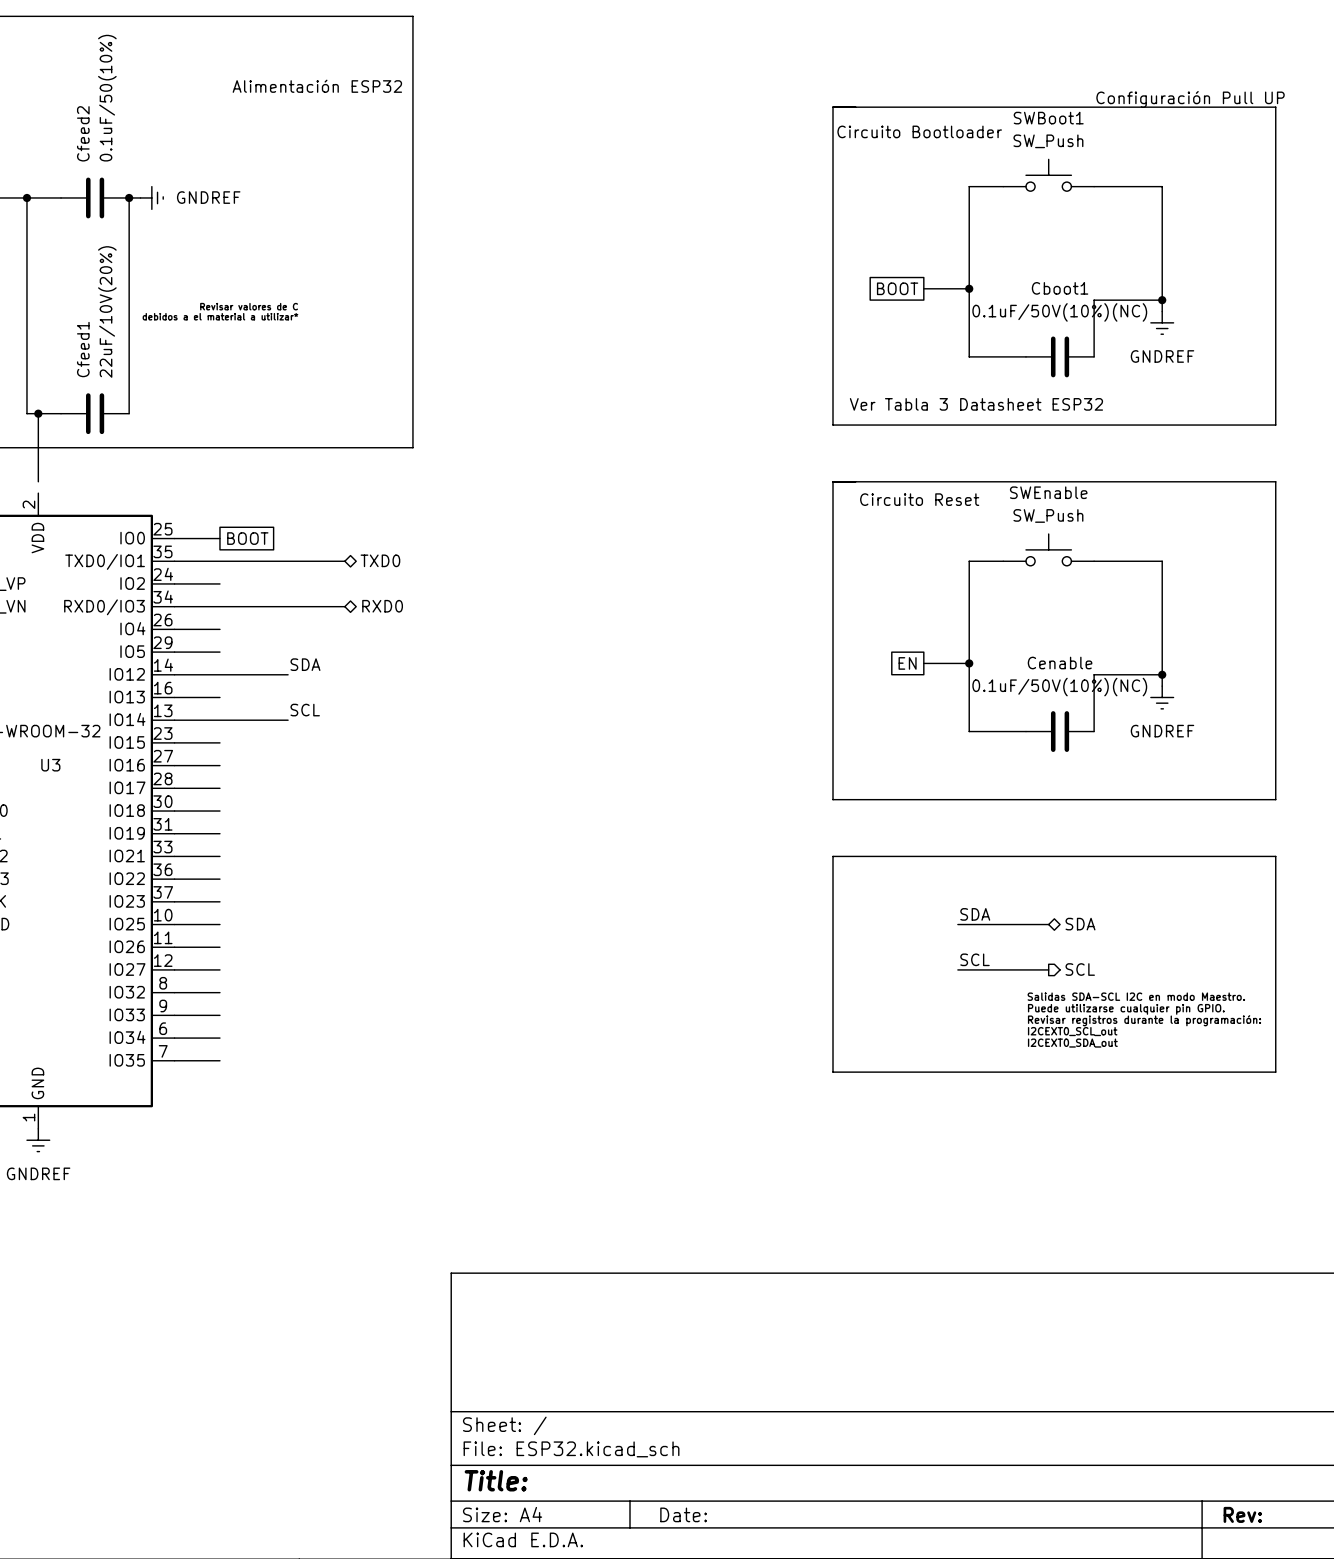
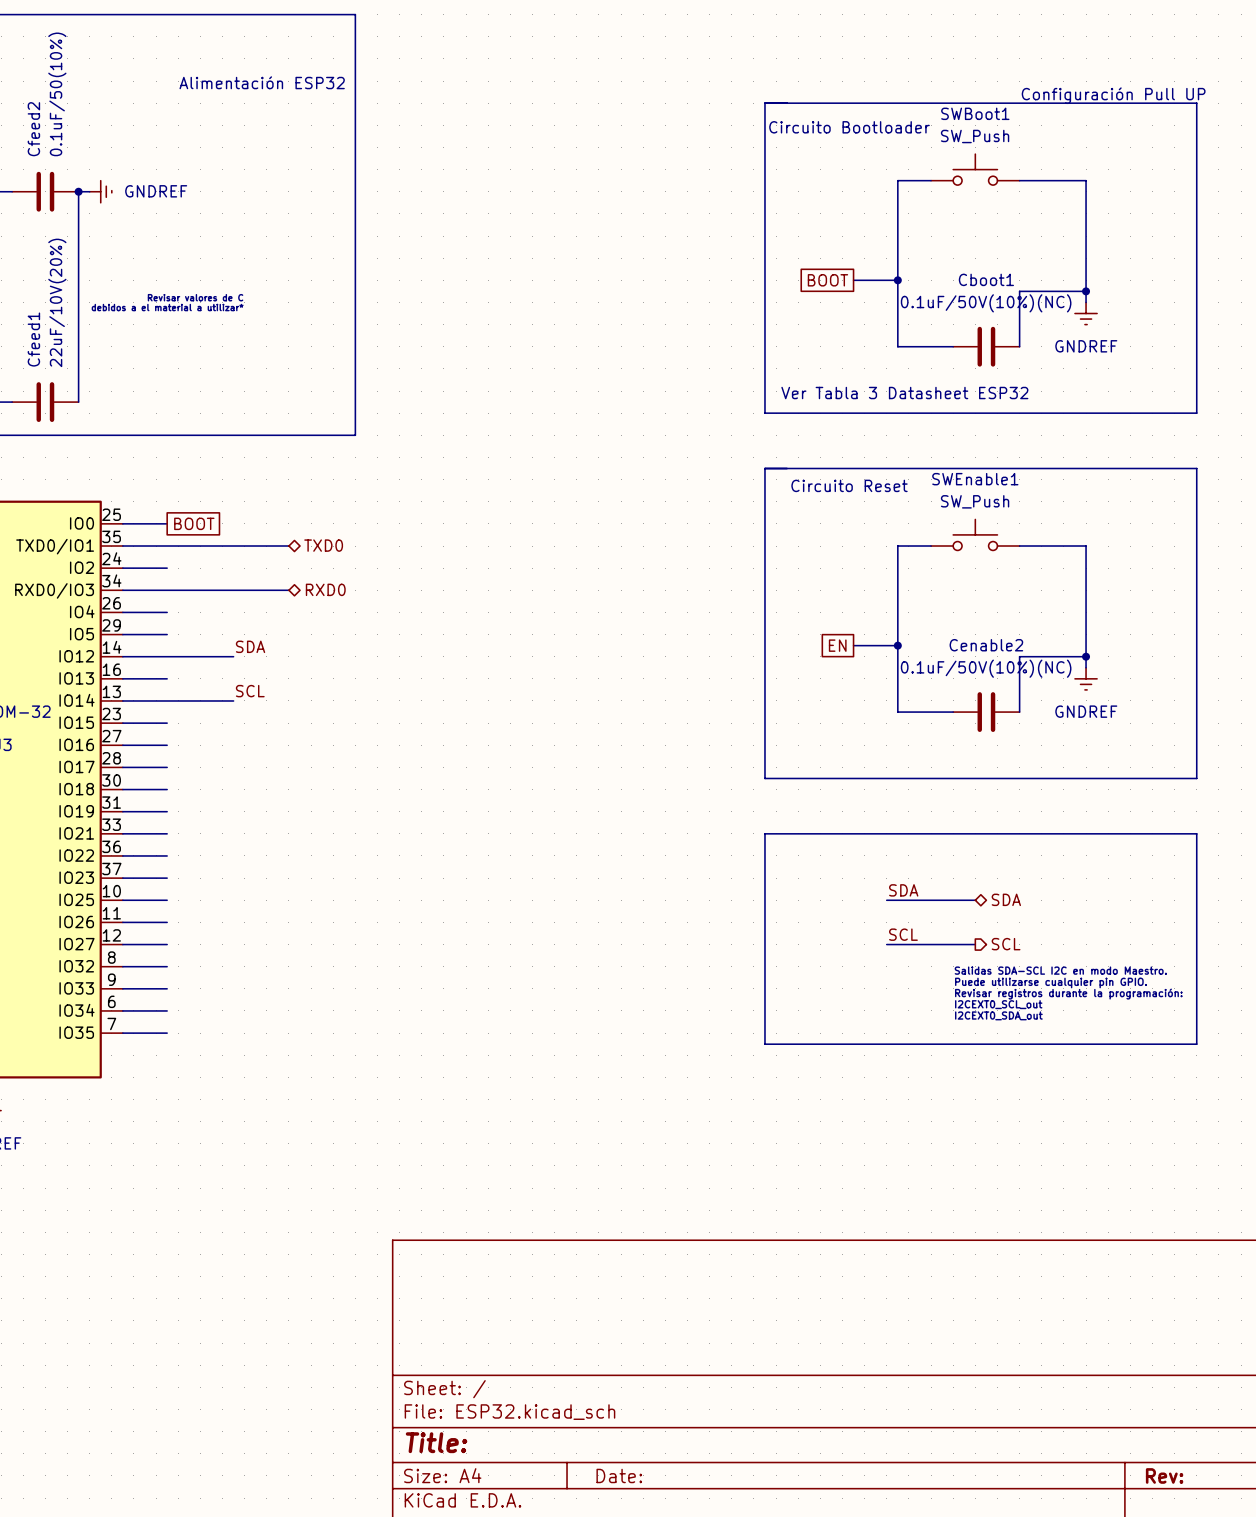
SWEnable name: SWEnable (1048, 492) -> SWEnable1 (975, 479)
Cenable name: Cenable (1060, 663) -> Cenable2 (986, 645)

